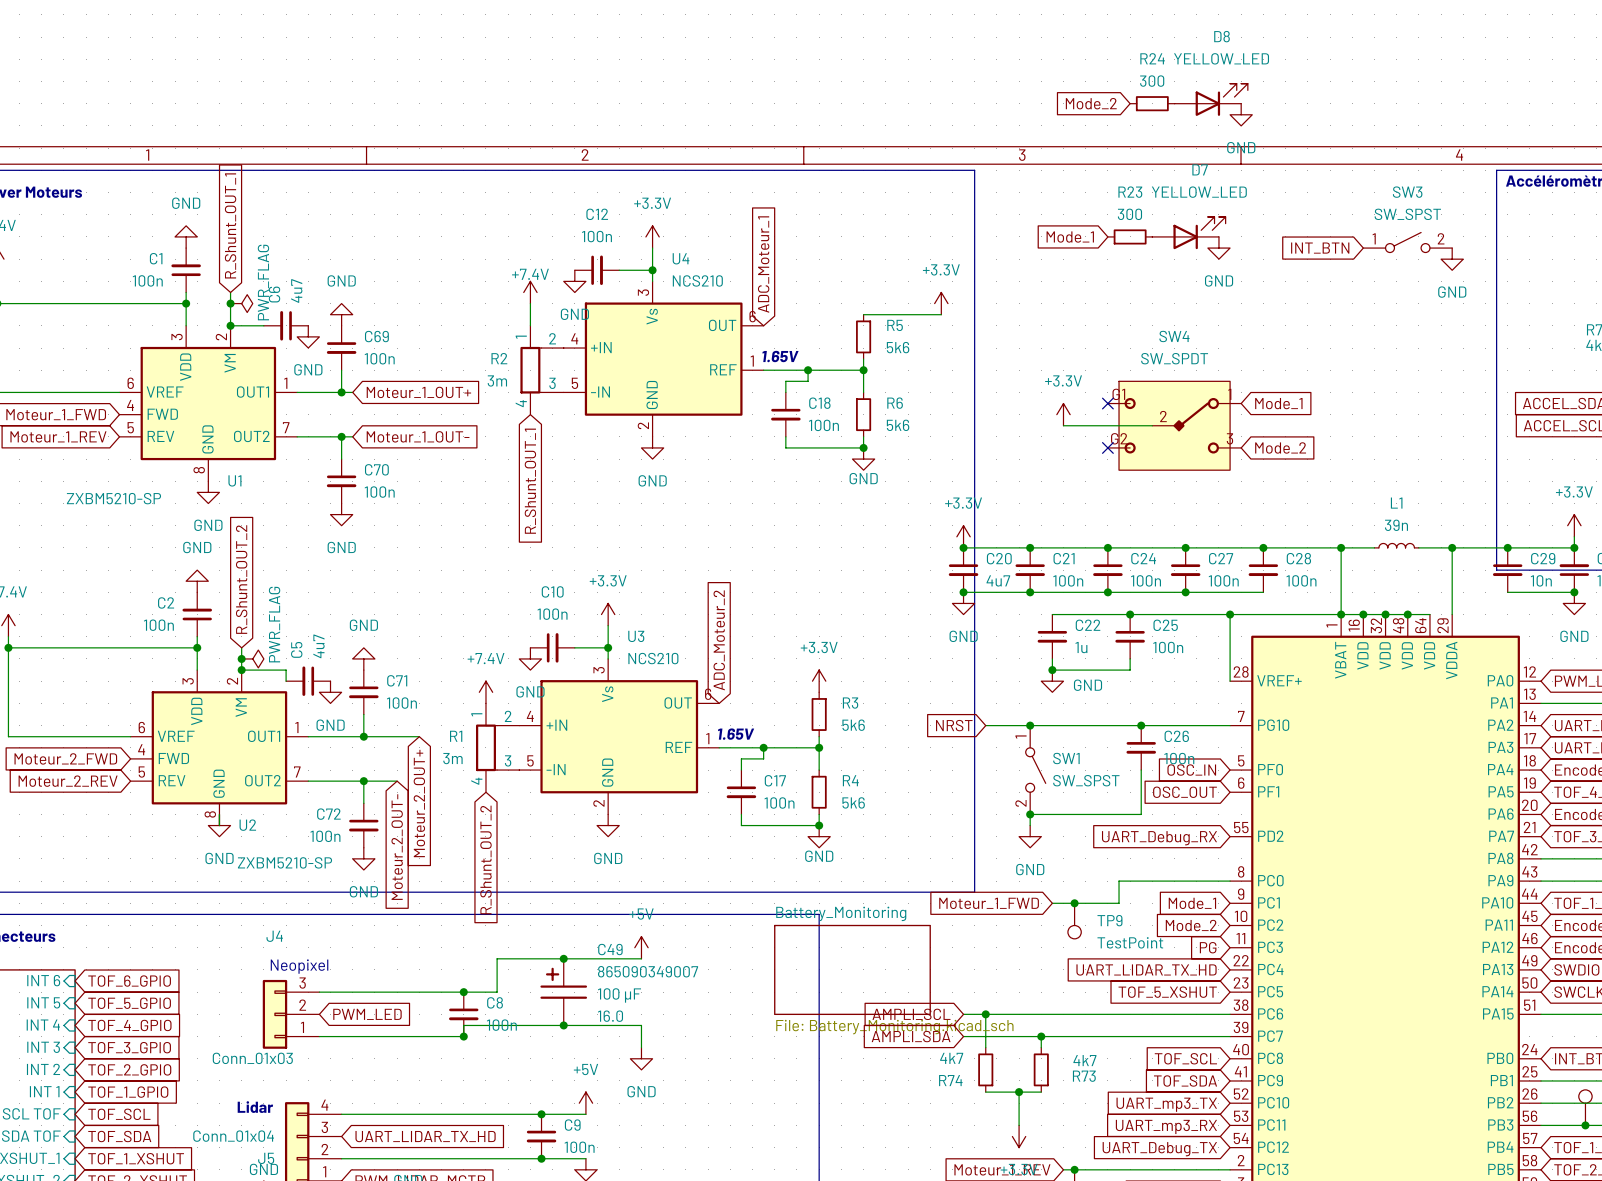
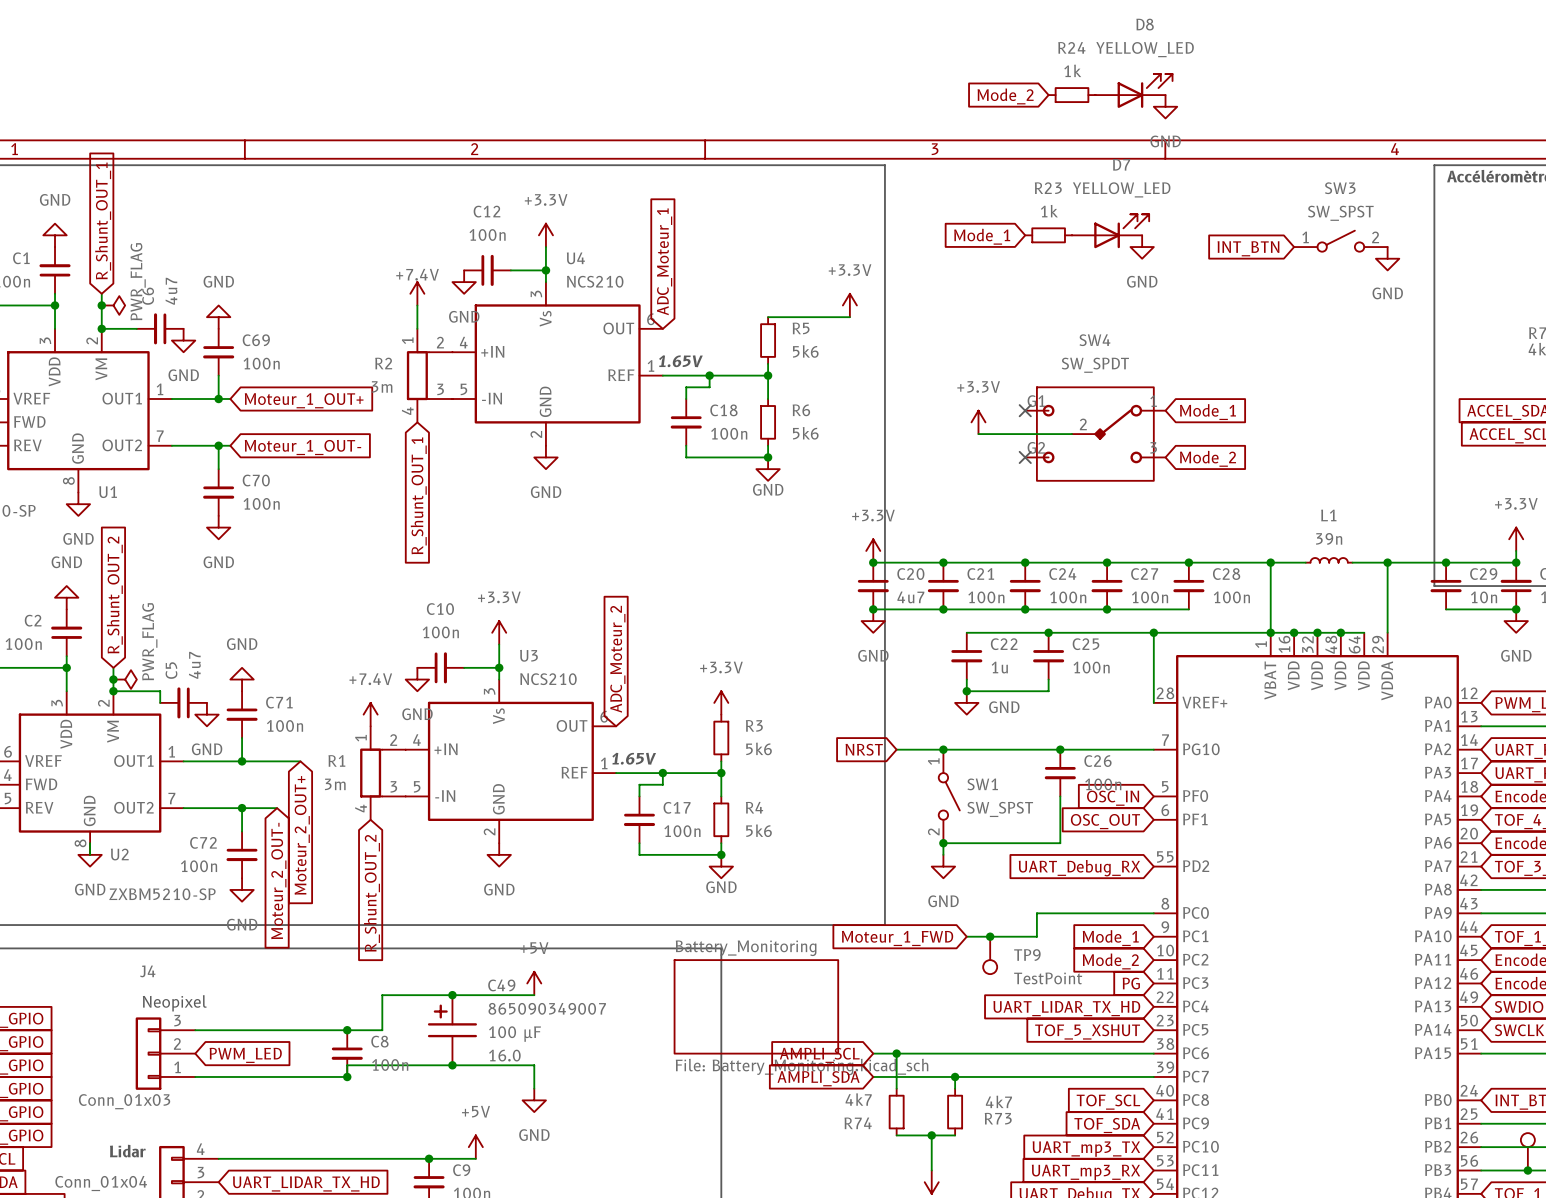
R24 value: 300 (1152, 81) -> 1k (1072, 70)
R23 value: 300 (1129, 214) -> 1k (1049, 211)

